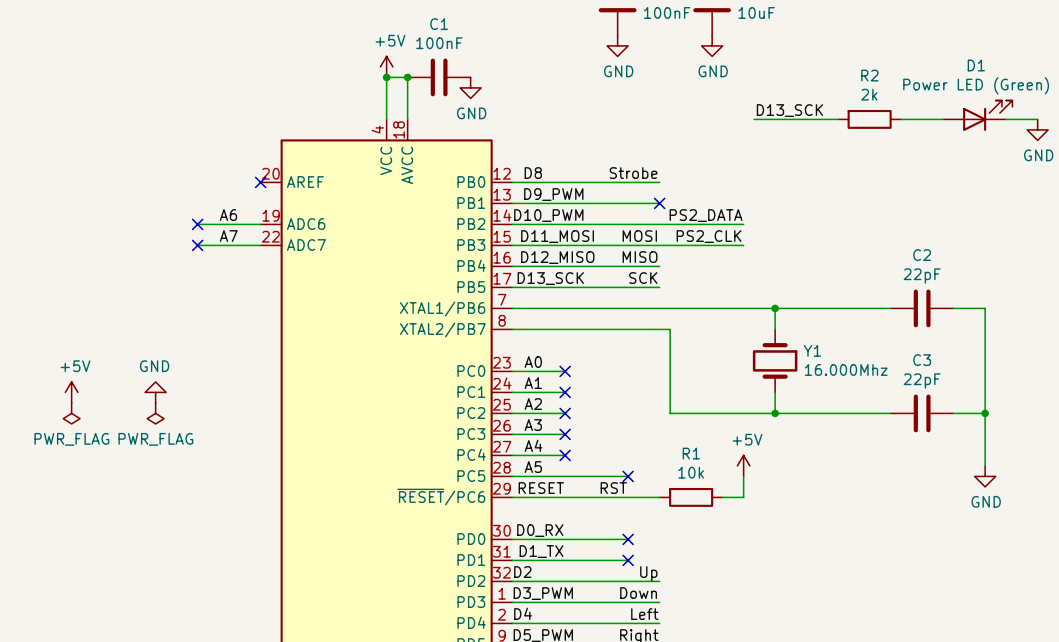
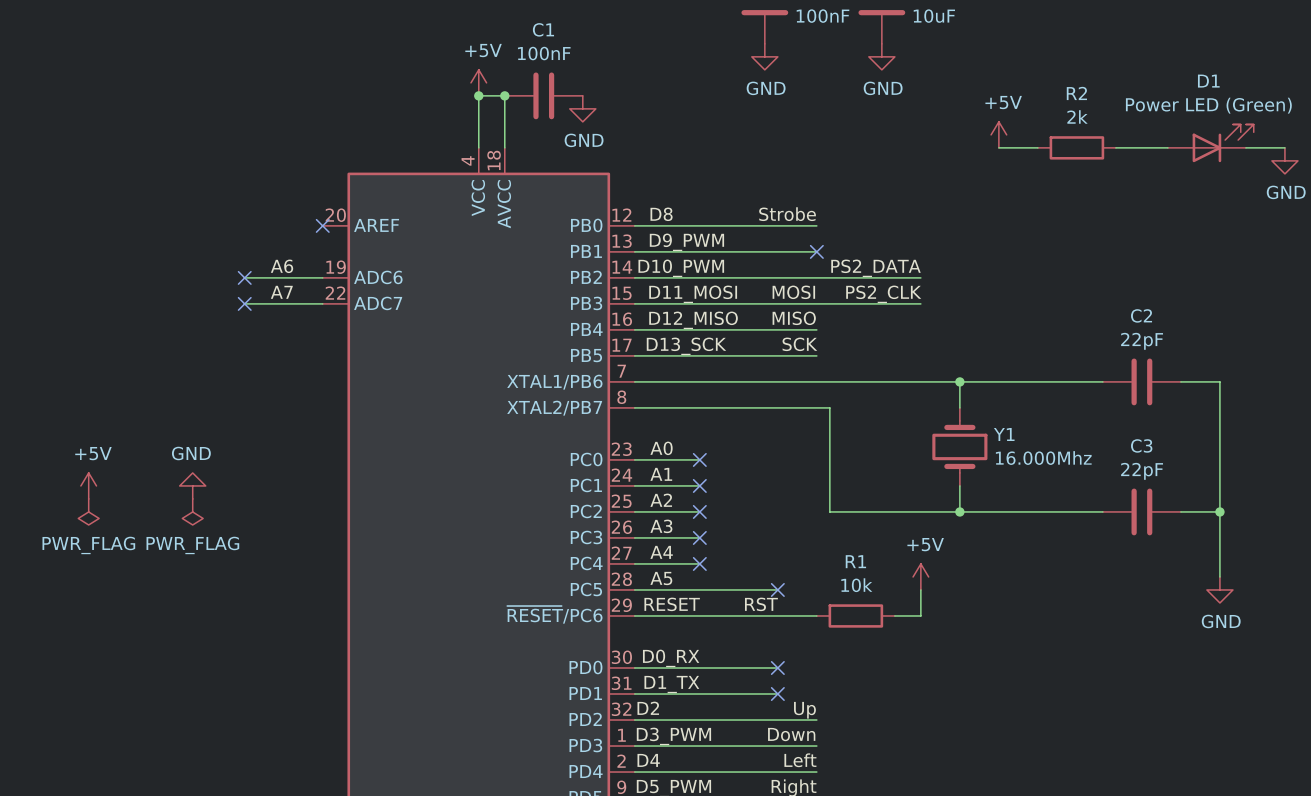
power symbol: none -> +5V (998, 134)
label: D13_SCK (789, 110) -> none
wire: (754, 119) (806, 119) -> none

